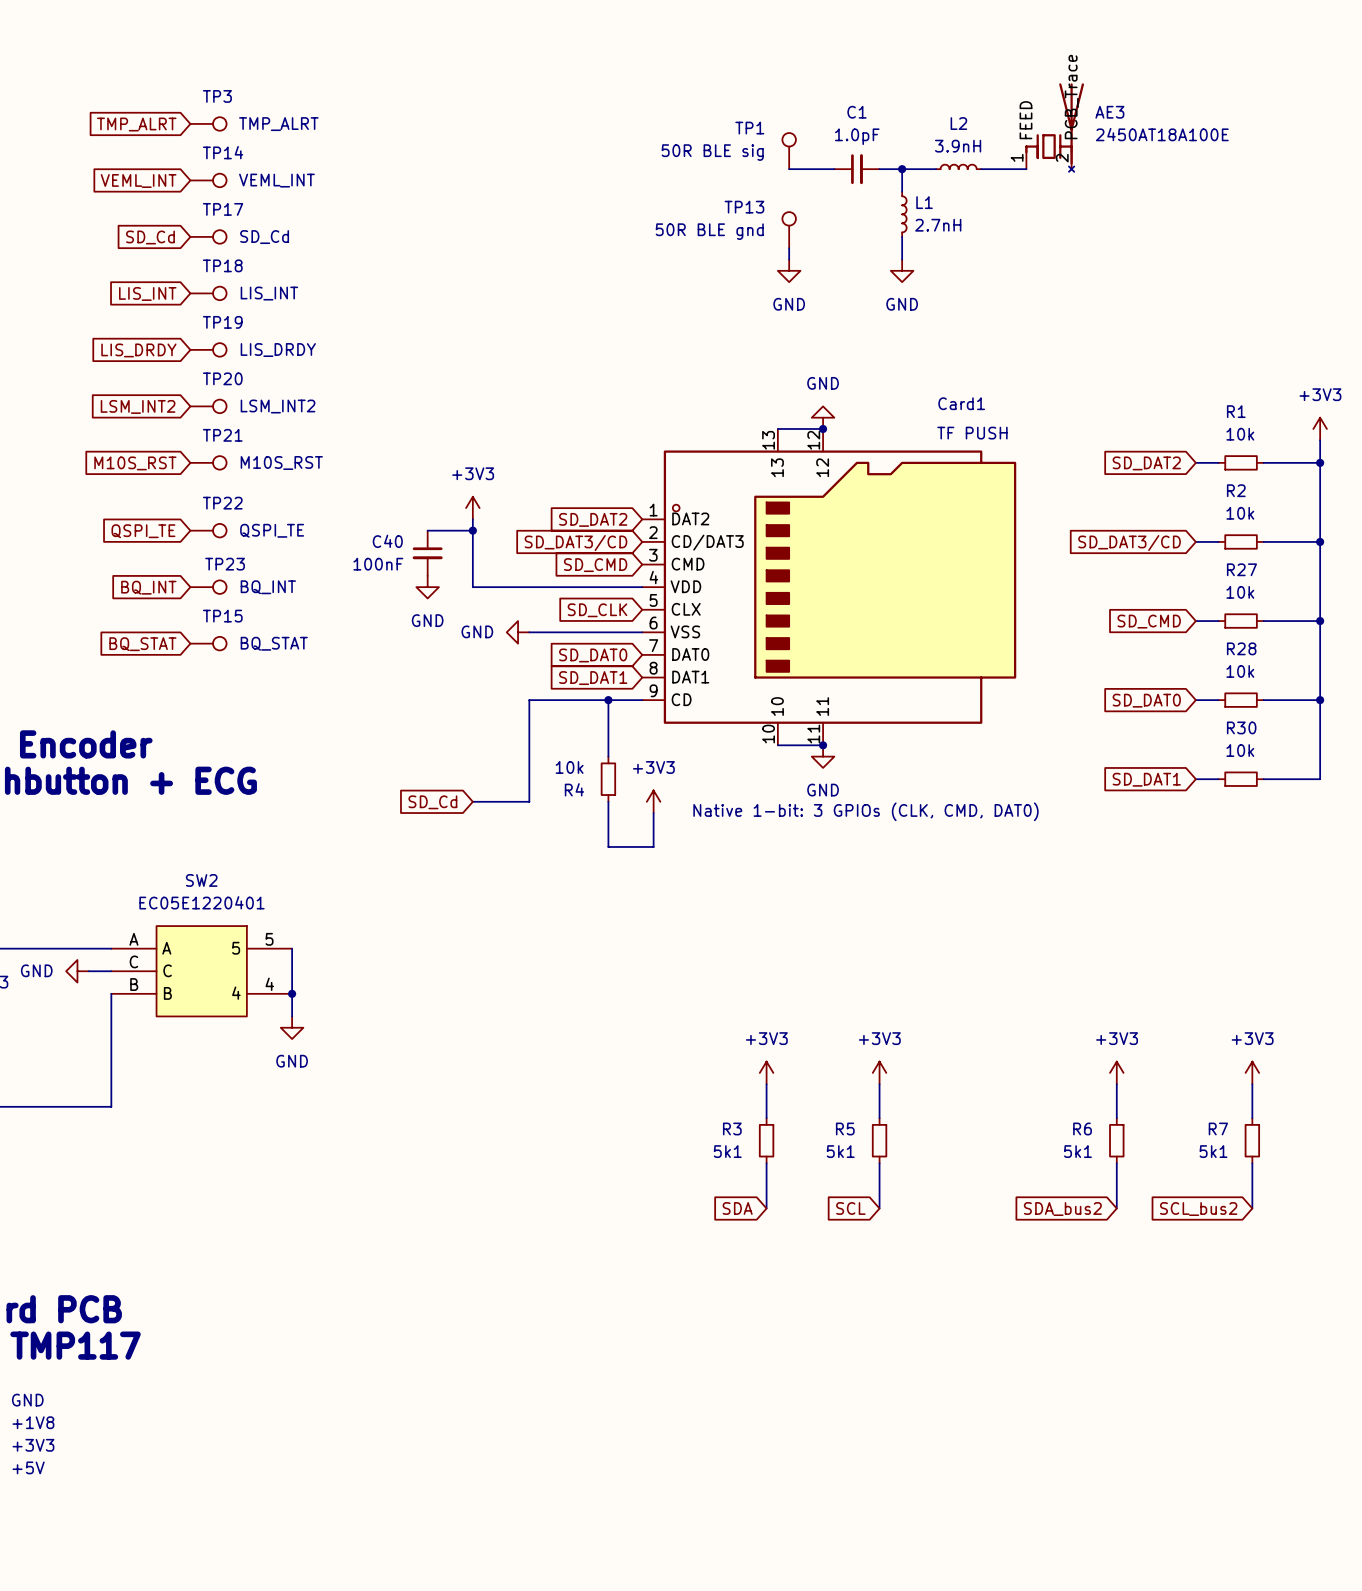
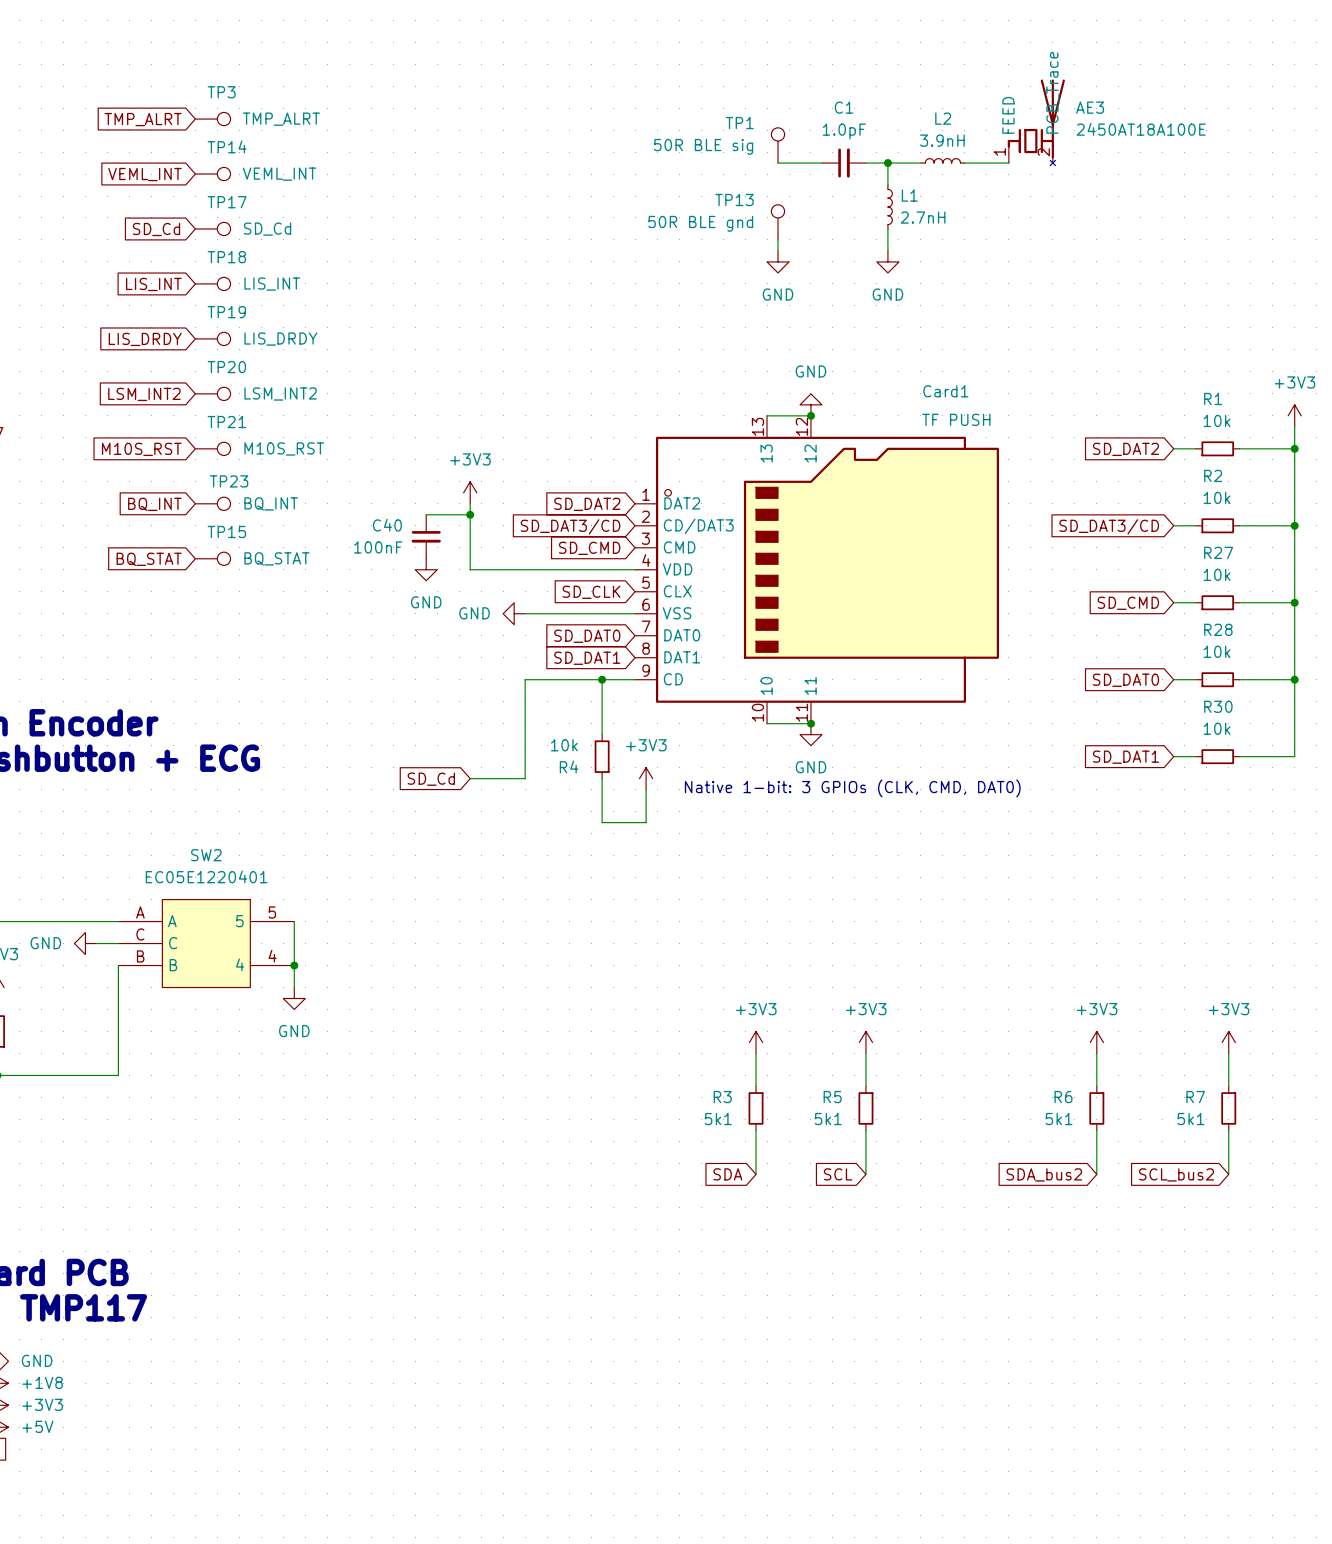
TP22: QSPI_TE (208, 530) -> none
global label: QSPI_TE (143, 531) -> none
global label position: BQ_INT (148, 587) -> BQ_INT (154, 504)
TP23 position: (208, 587) -> (212, 503)
TP15 position: (208, 643) -> (212, 558)
global label position: BQ_STAT (142, 644) -> BQ_STAT (149, 559)

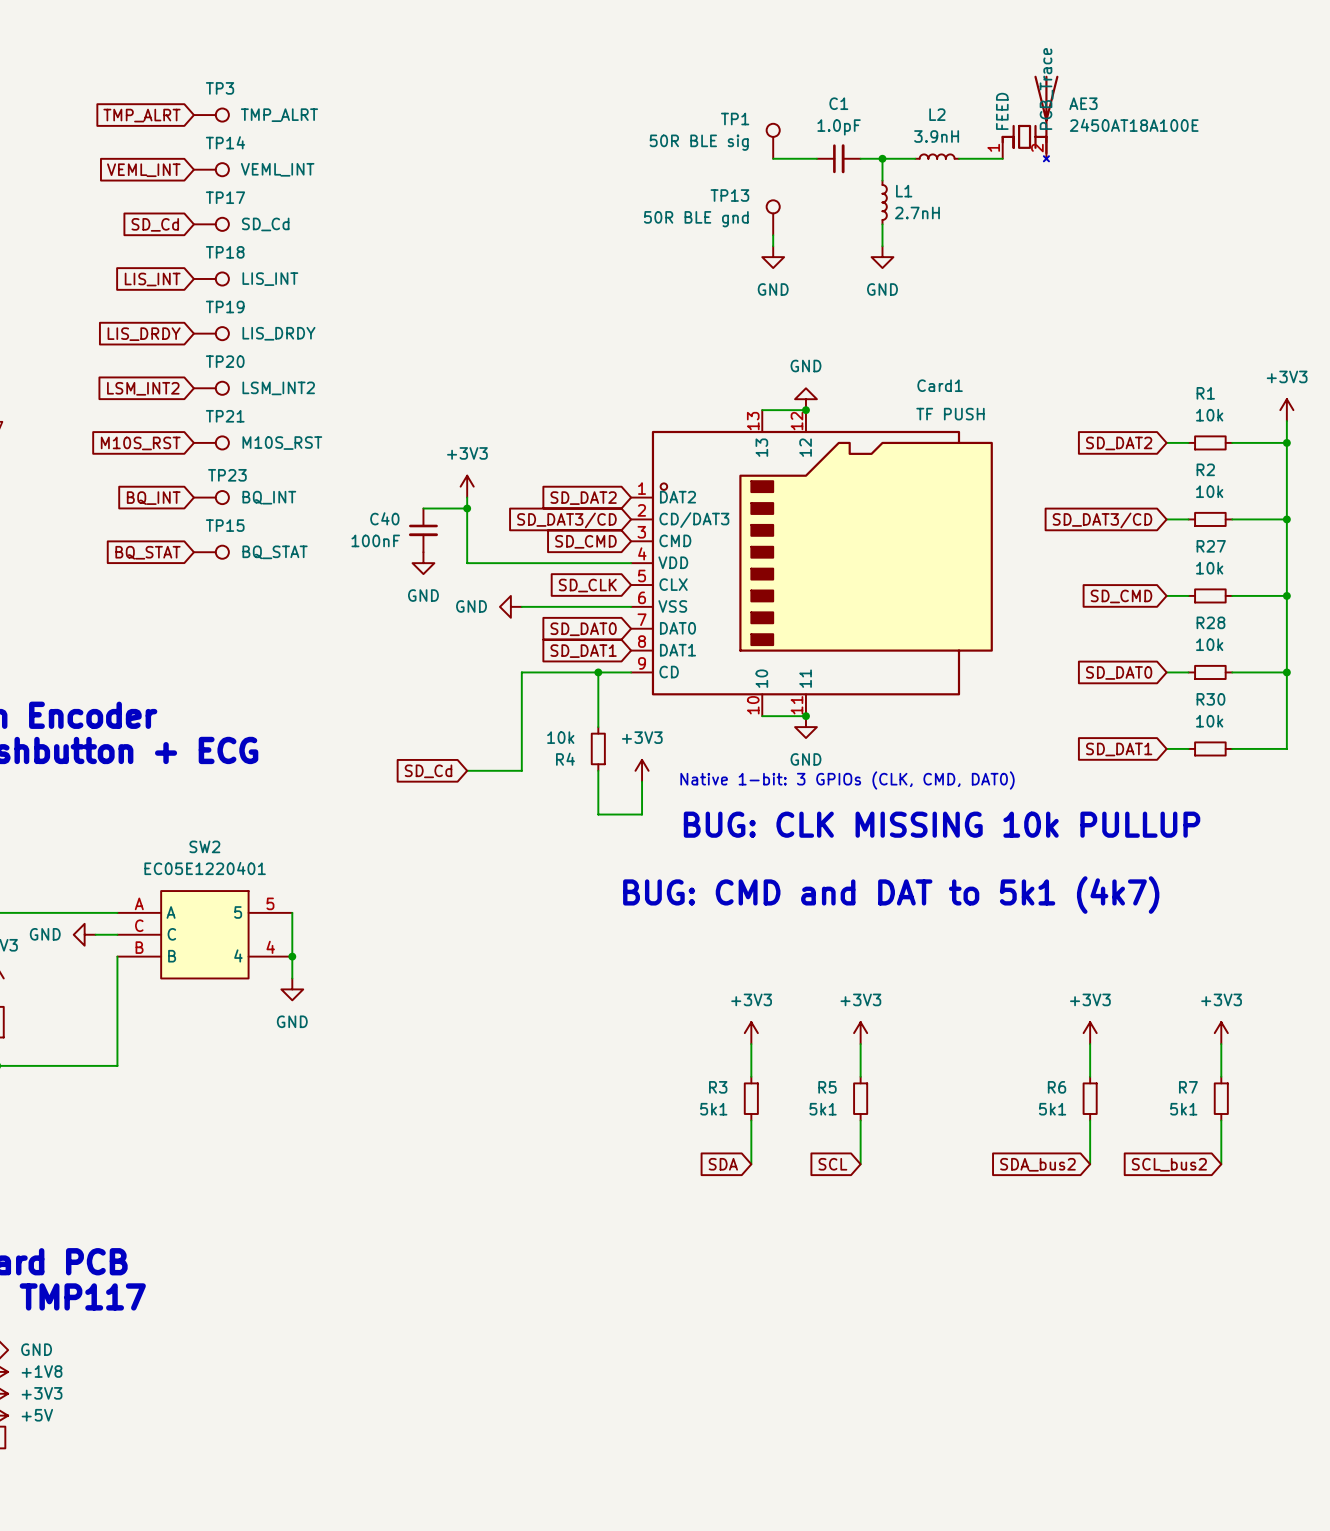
text: none -> BUG: CLK MISSING 10k PULLUP (942, 824)
text: none -> BUG: CMD and DAT to 5k1 (4k7) (891, 895)

